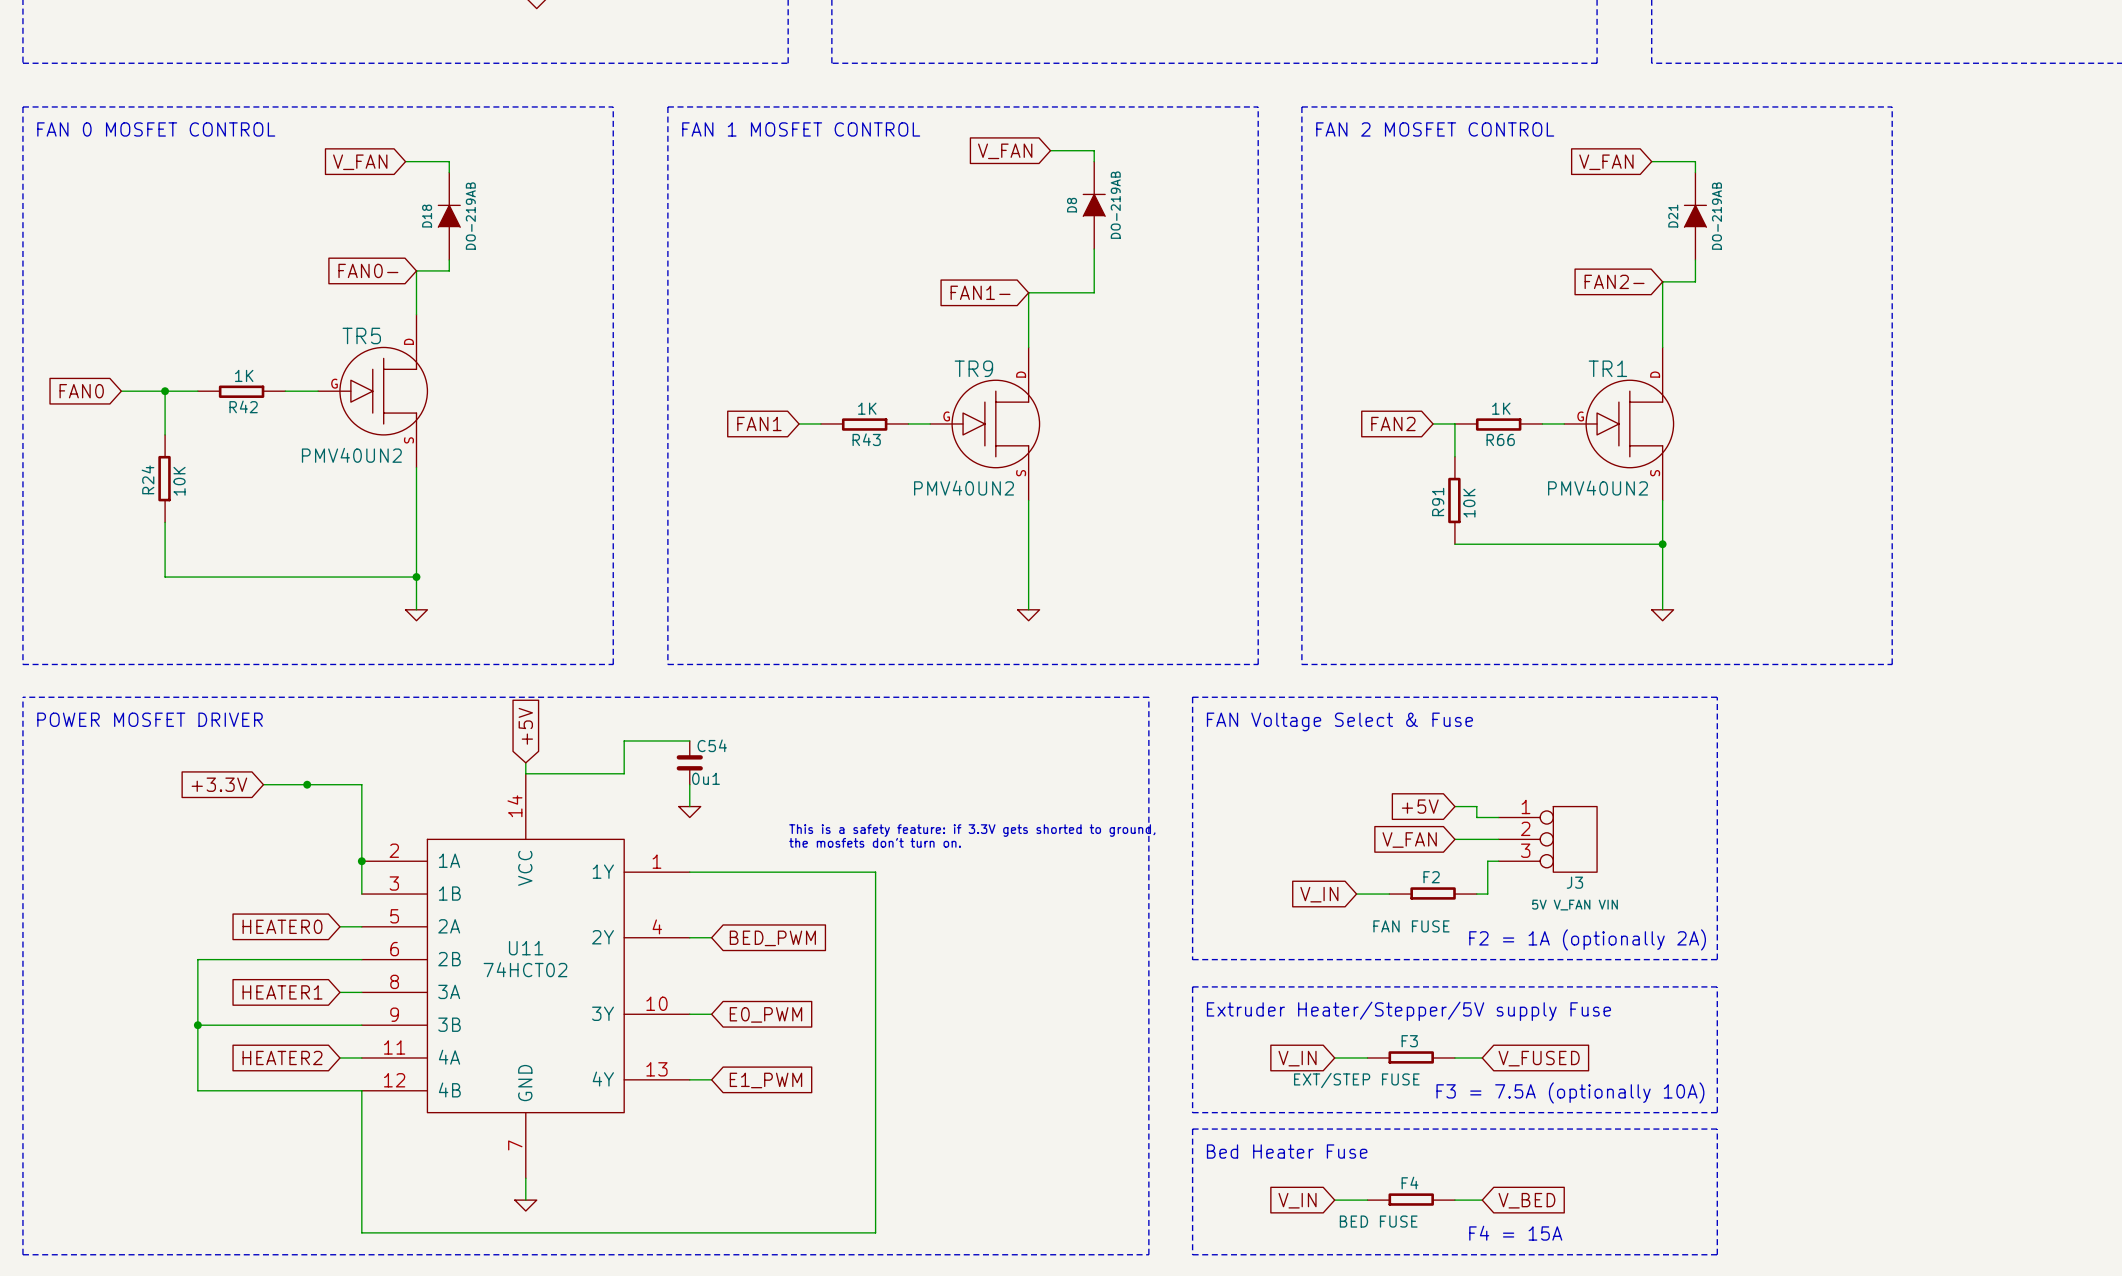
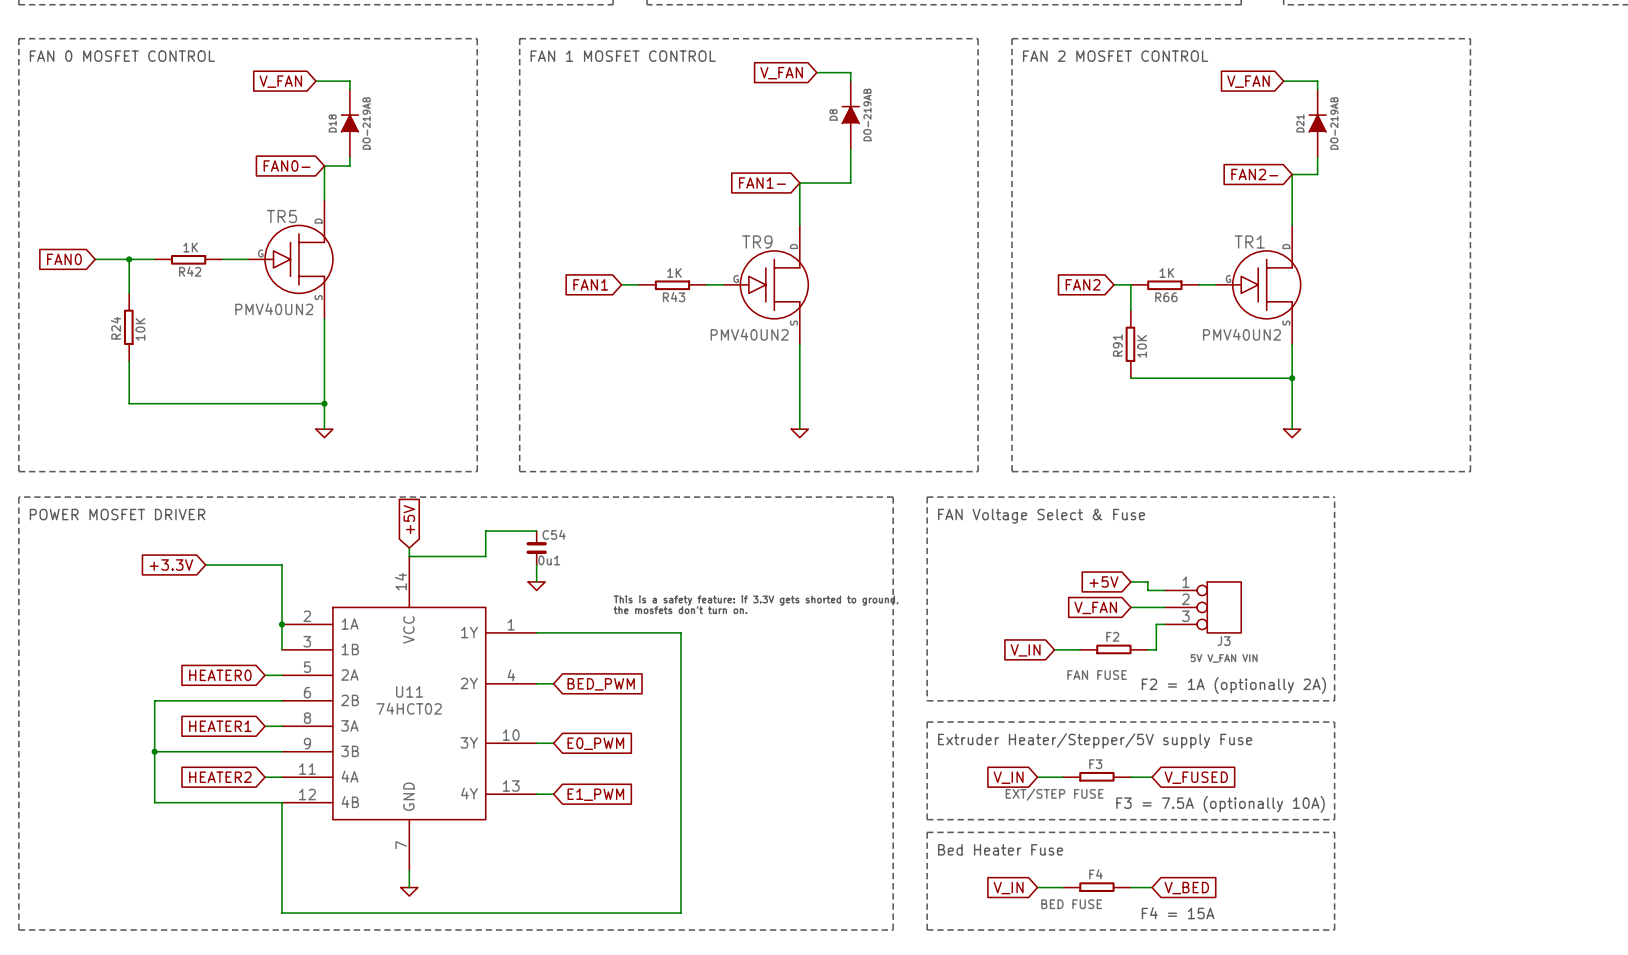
junction: (307, 784) -> none

